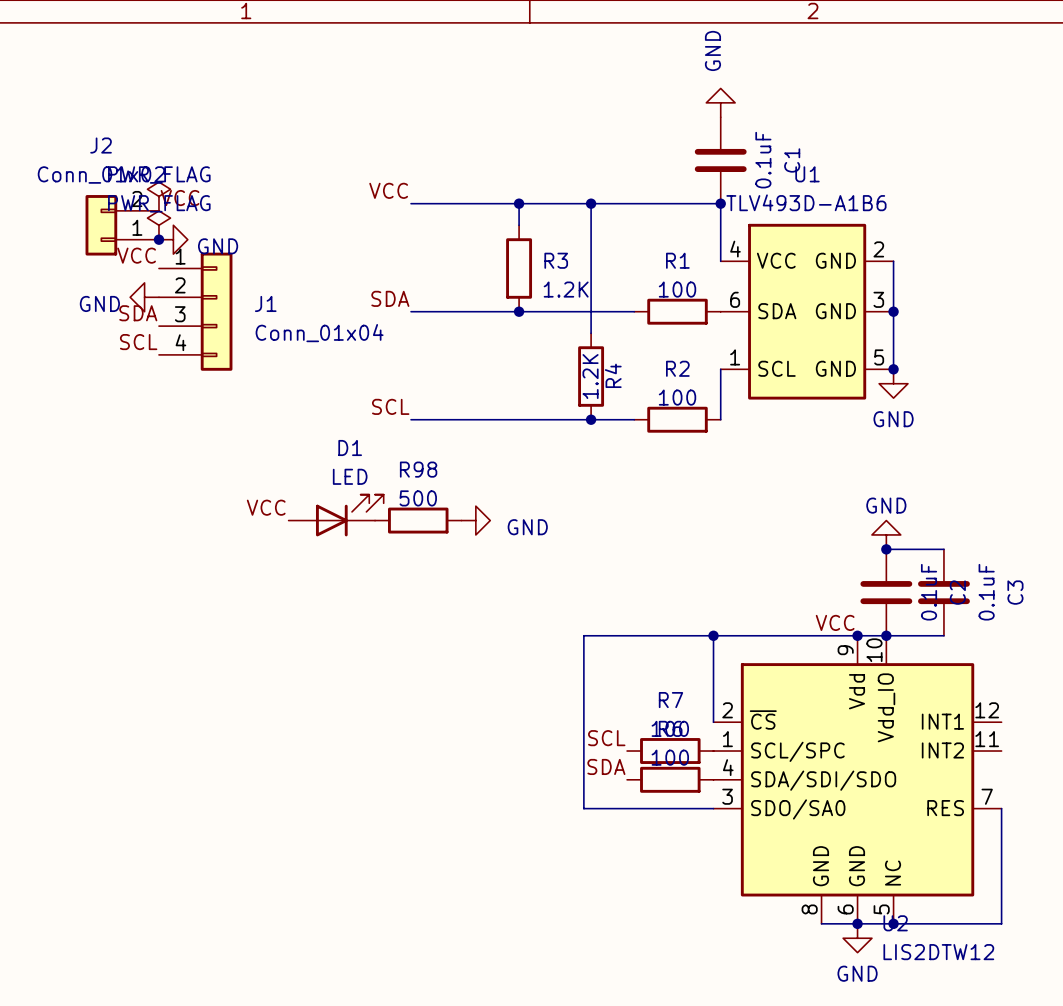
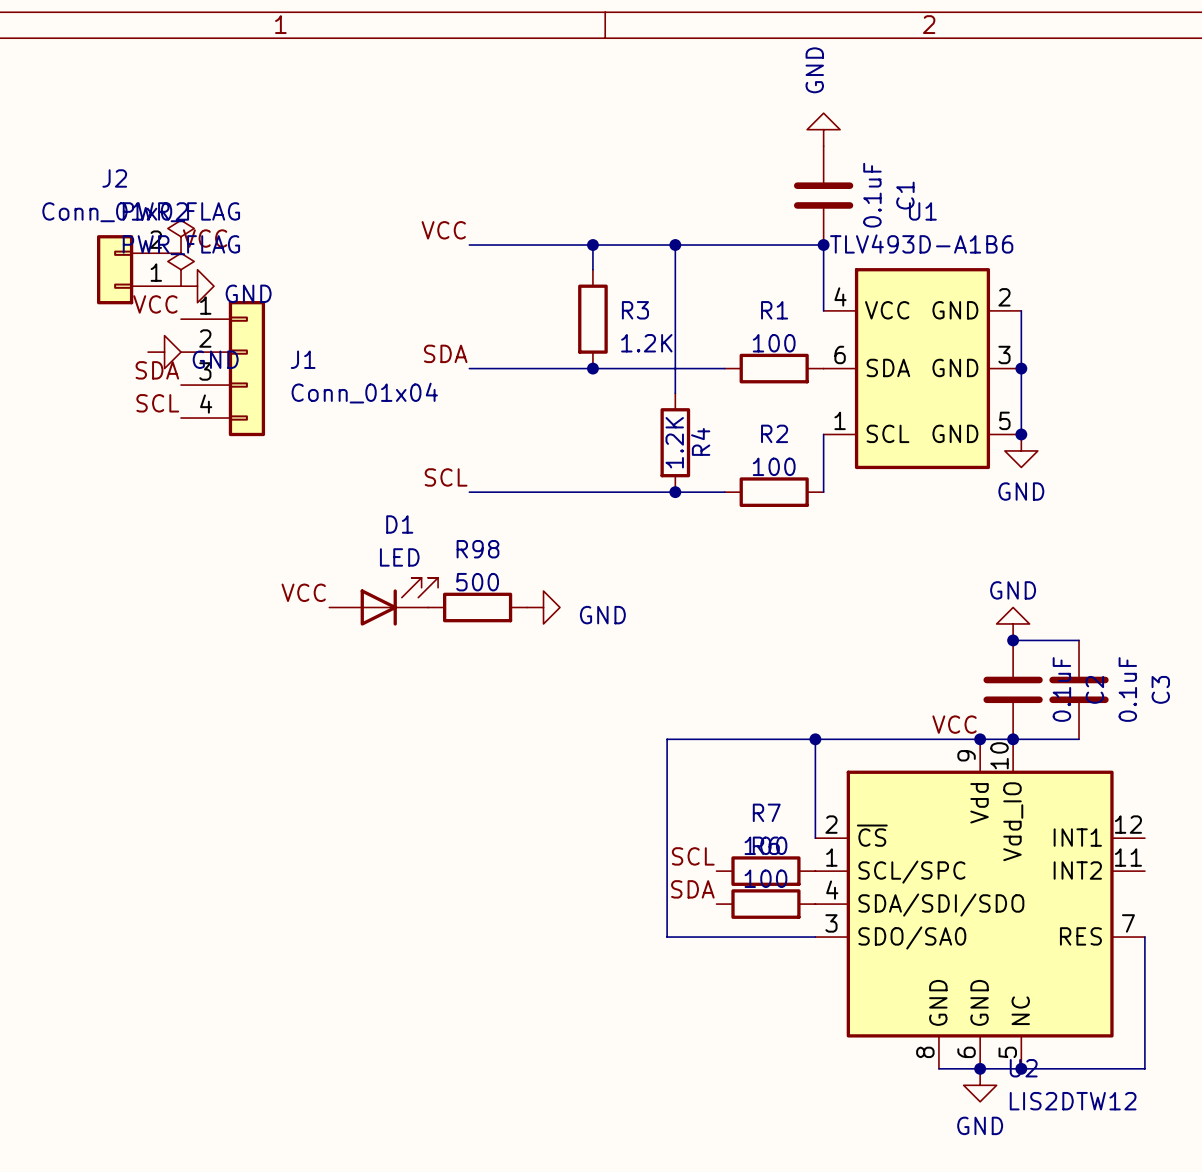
junction: (158, 239) -> none
power symbol rotation: 0° (144, 297) -> 180° (164, 352)

